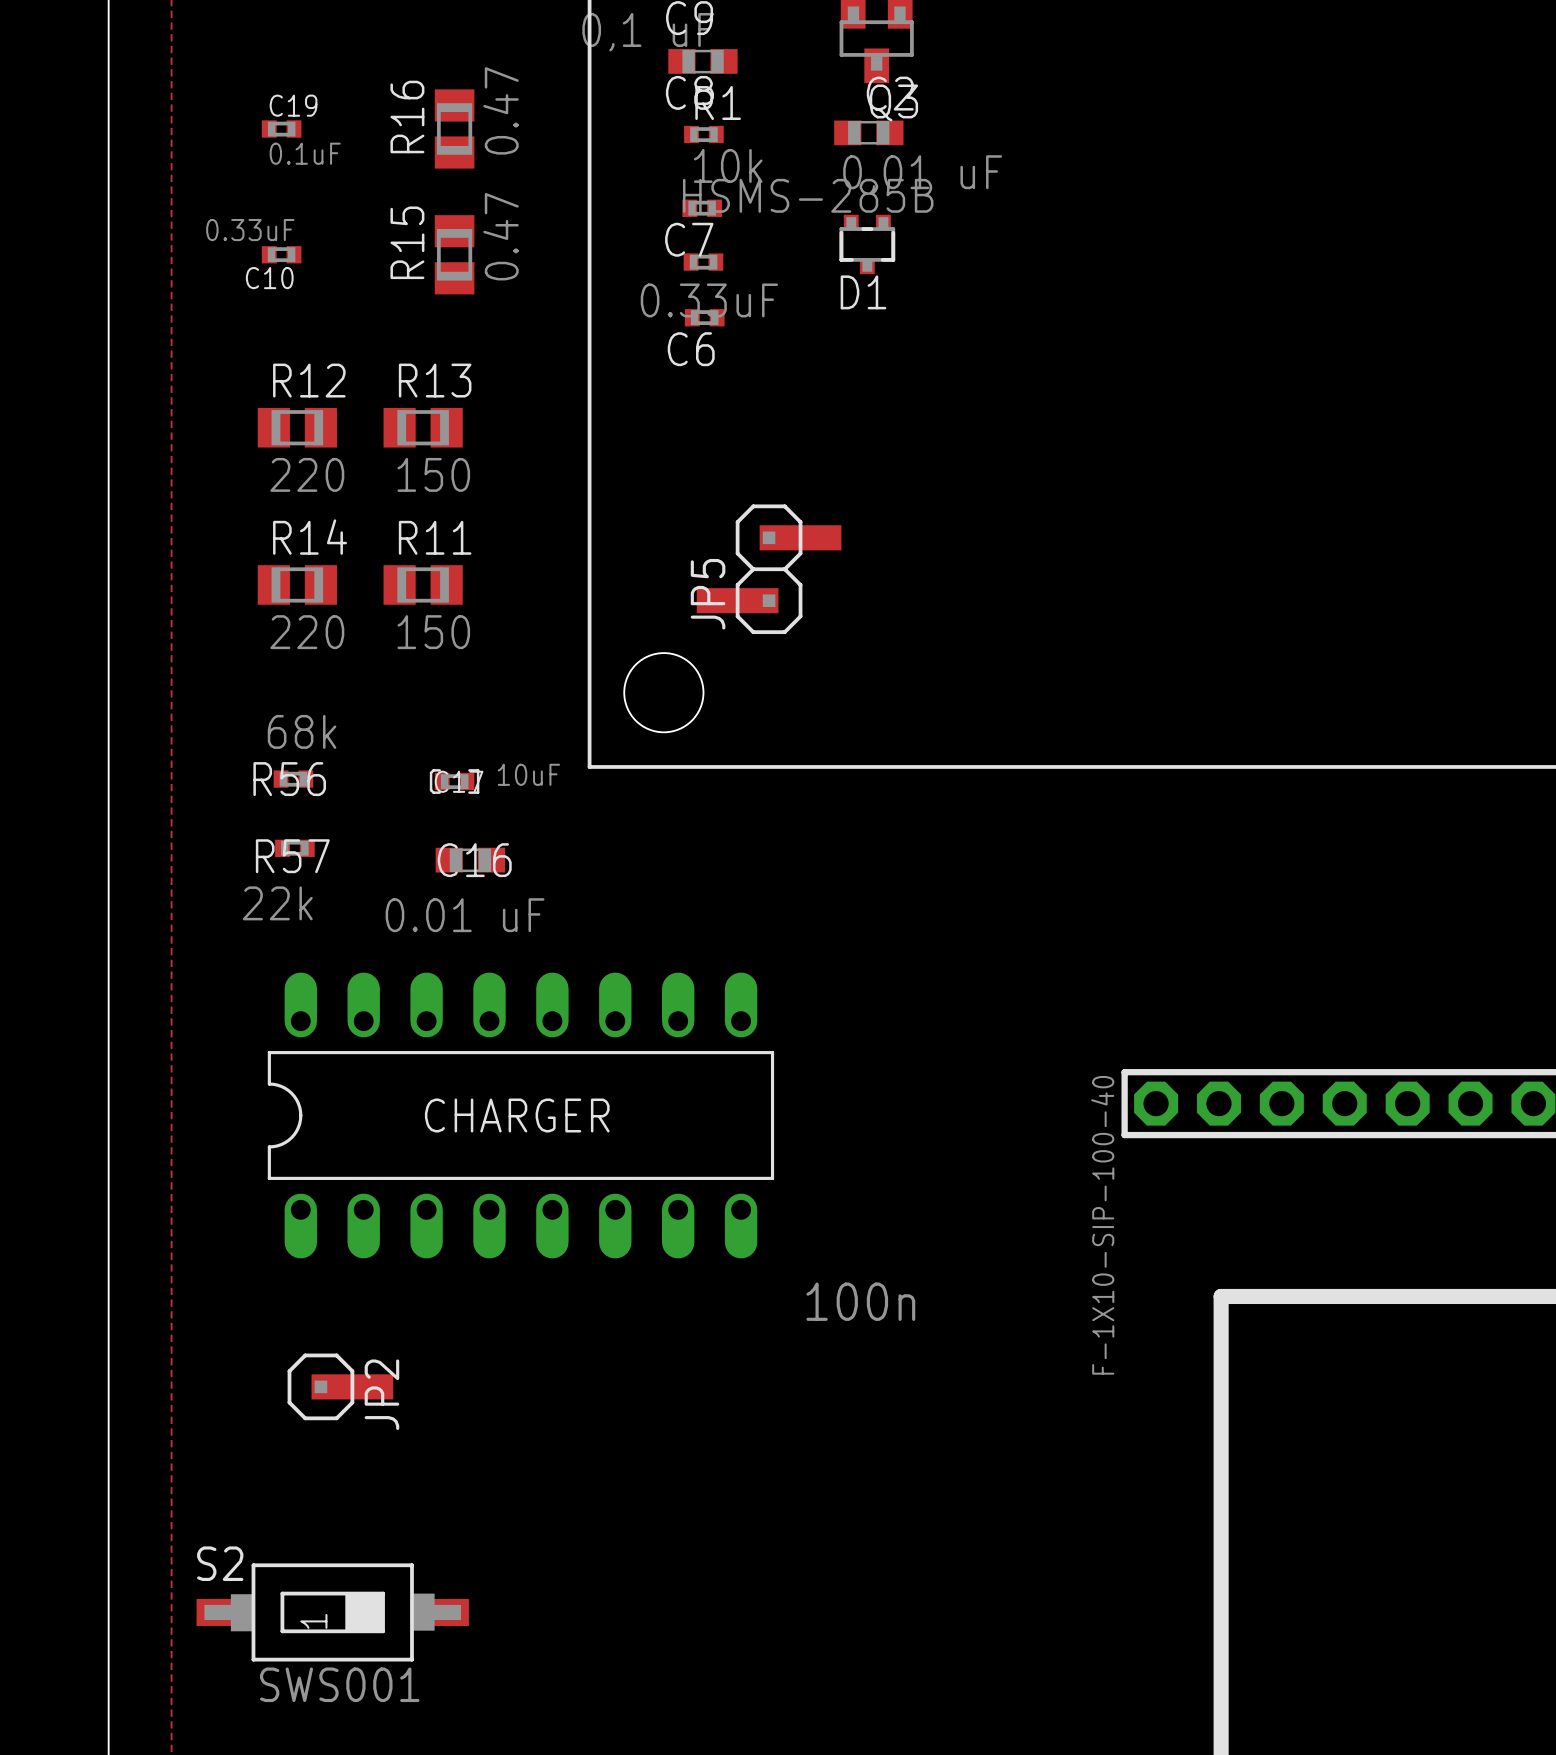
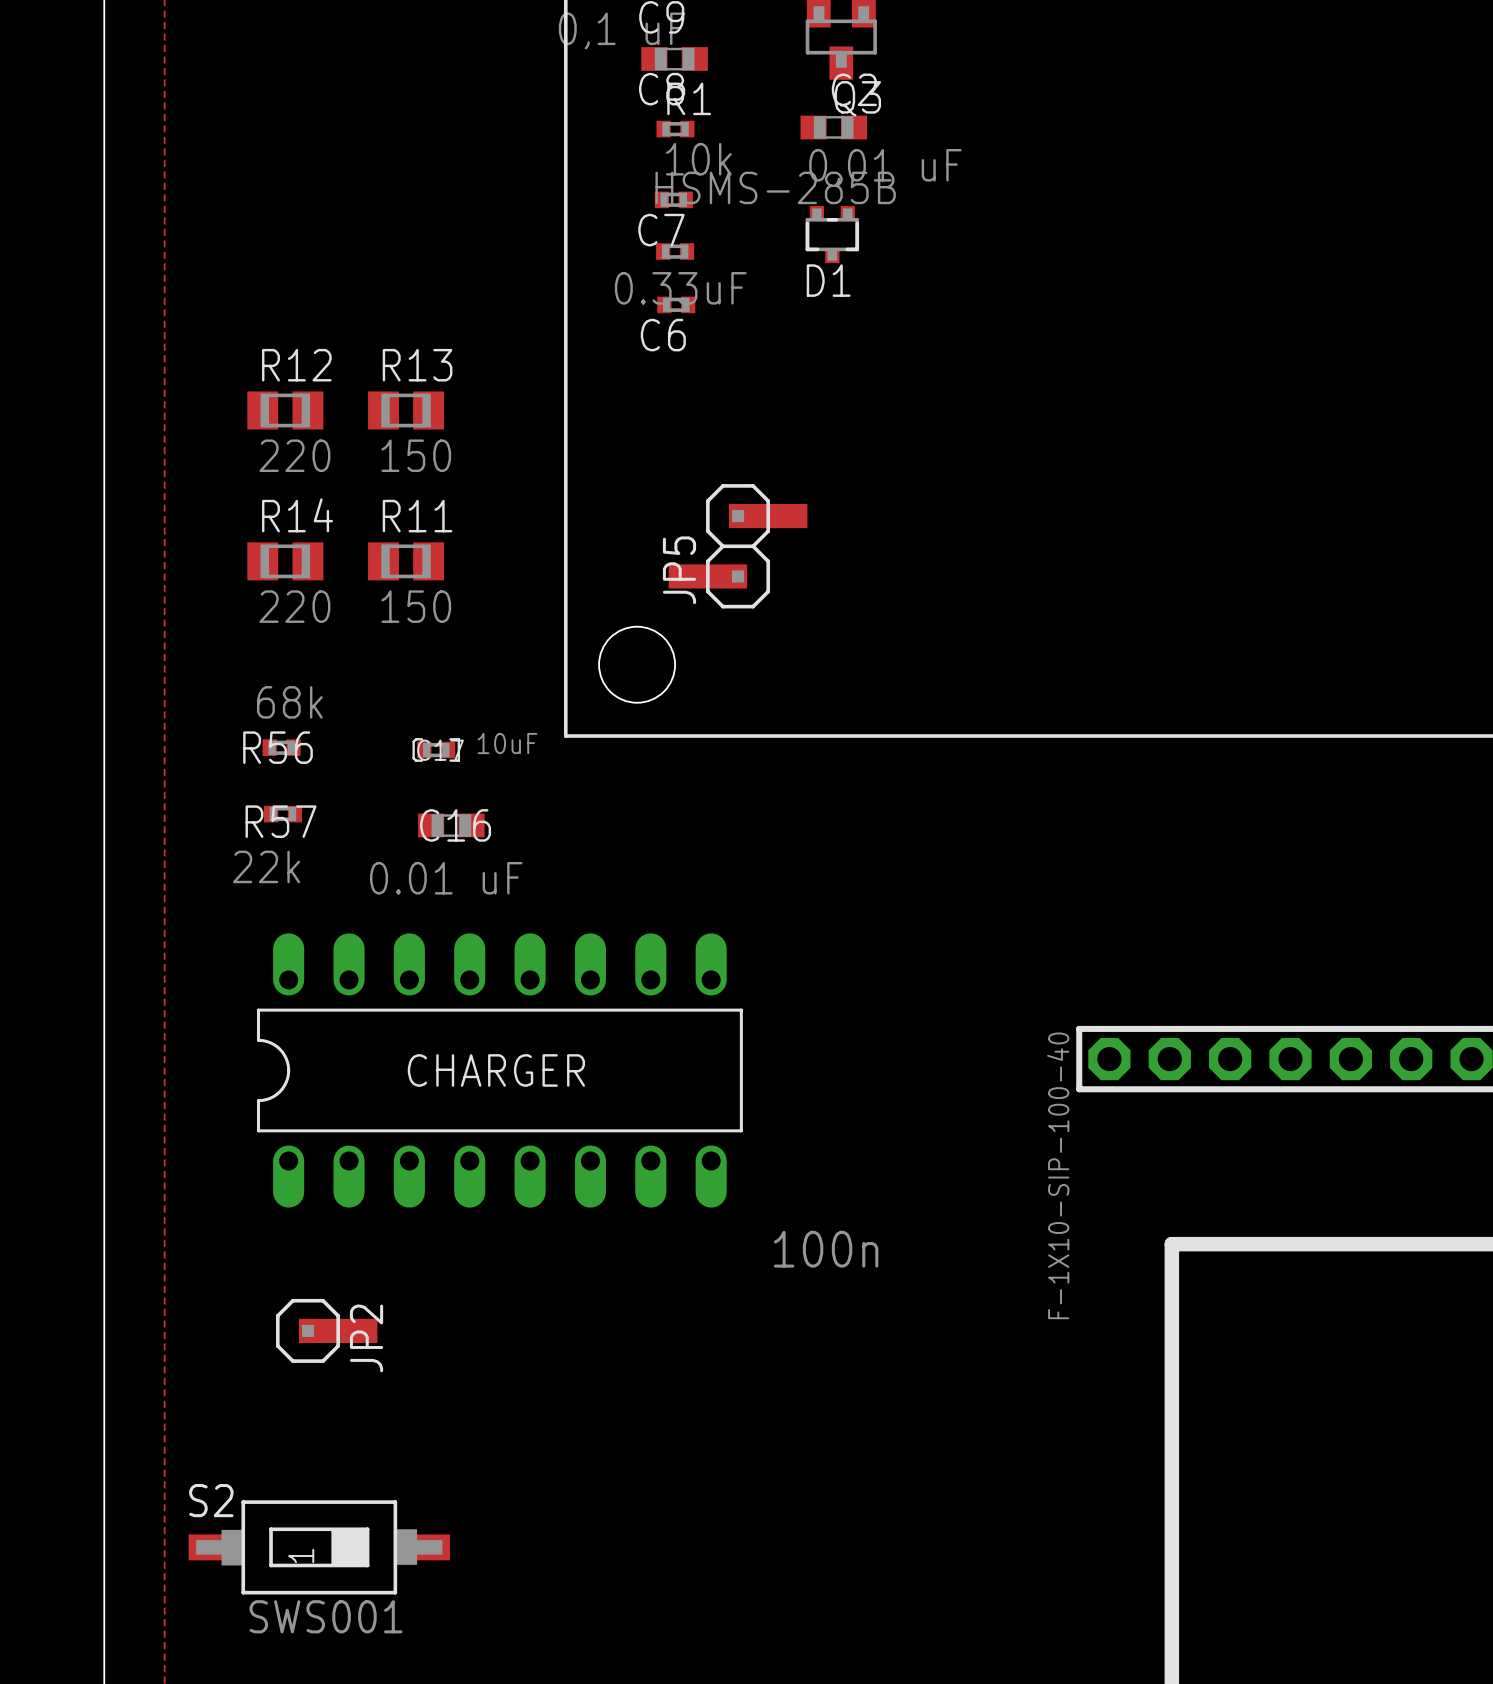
C19: 0.1uF (281, 128) -> none
R16: 0.47 (454, 128) -> none
C10: 0.33uF (281, 254) -> none
R15: 0.47 (454, 254) -> none

